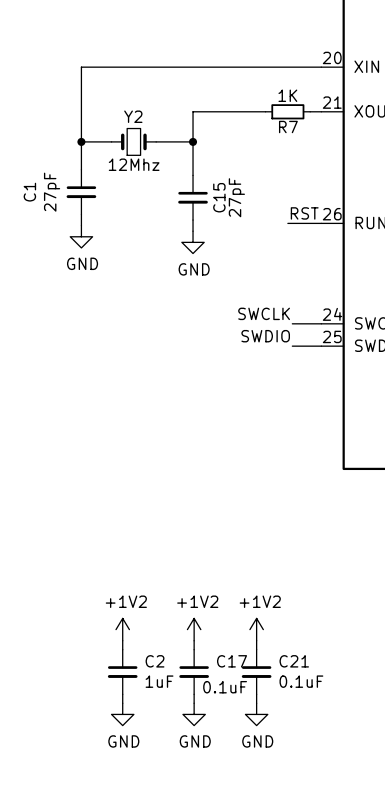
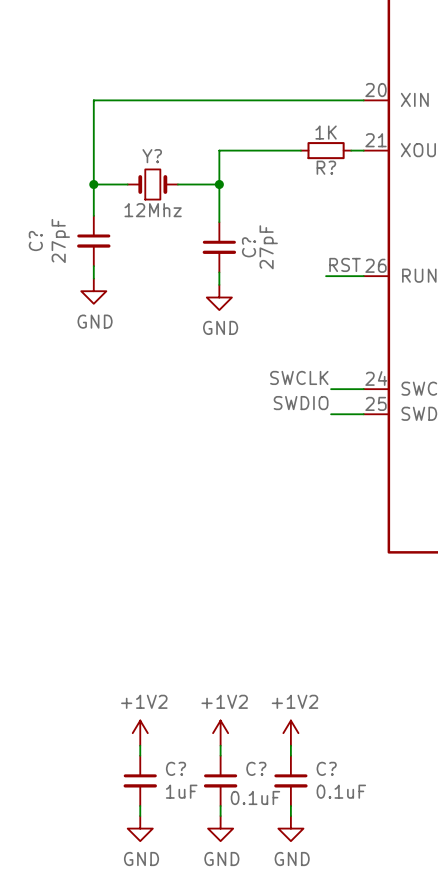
Y2 name: Y2 (133, 116) -> Y? (152, 156)
R7 name: R7 (288, 127) -> R? (326, 167)
C1 name: C1 (29, 192) -> C? (35, 241)
C15 name: C15 (219, 197) -> C? (249, 247)
C2 name: C2 (155, 661) -> C? (176, 768)
C17 name: C17 (232, 661) -> C? (256, 768)
C21 name: C21 (294, 661) -> C? (326, 768)

